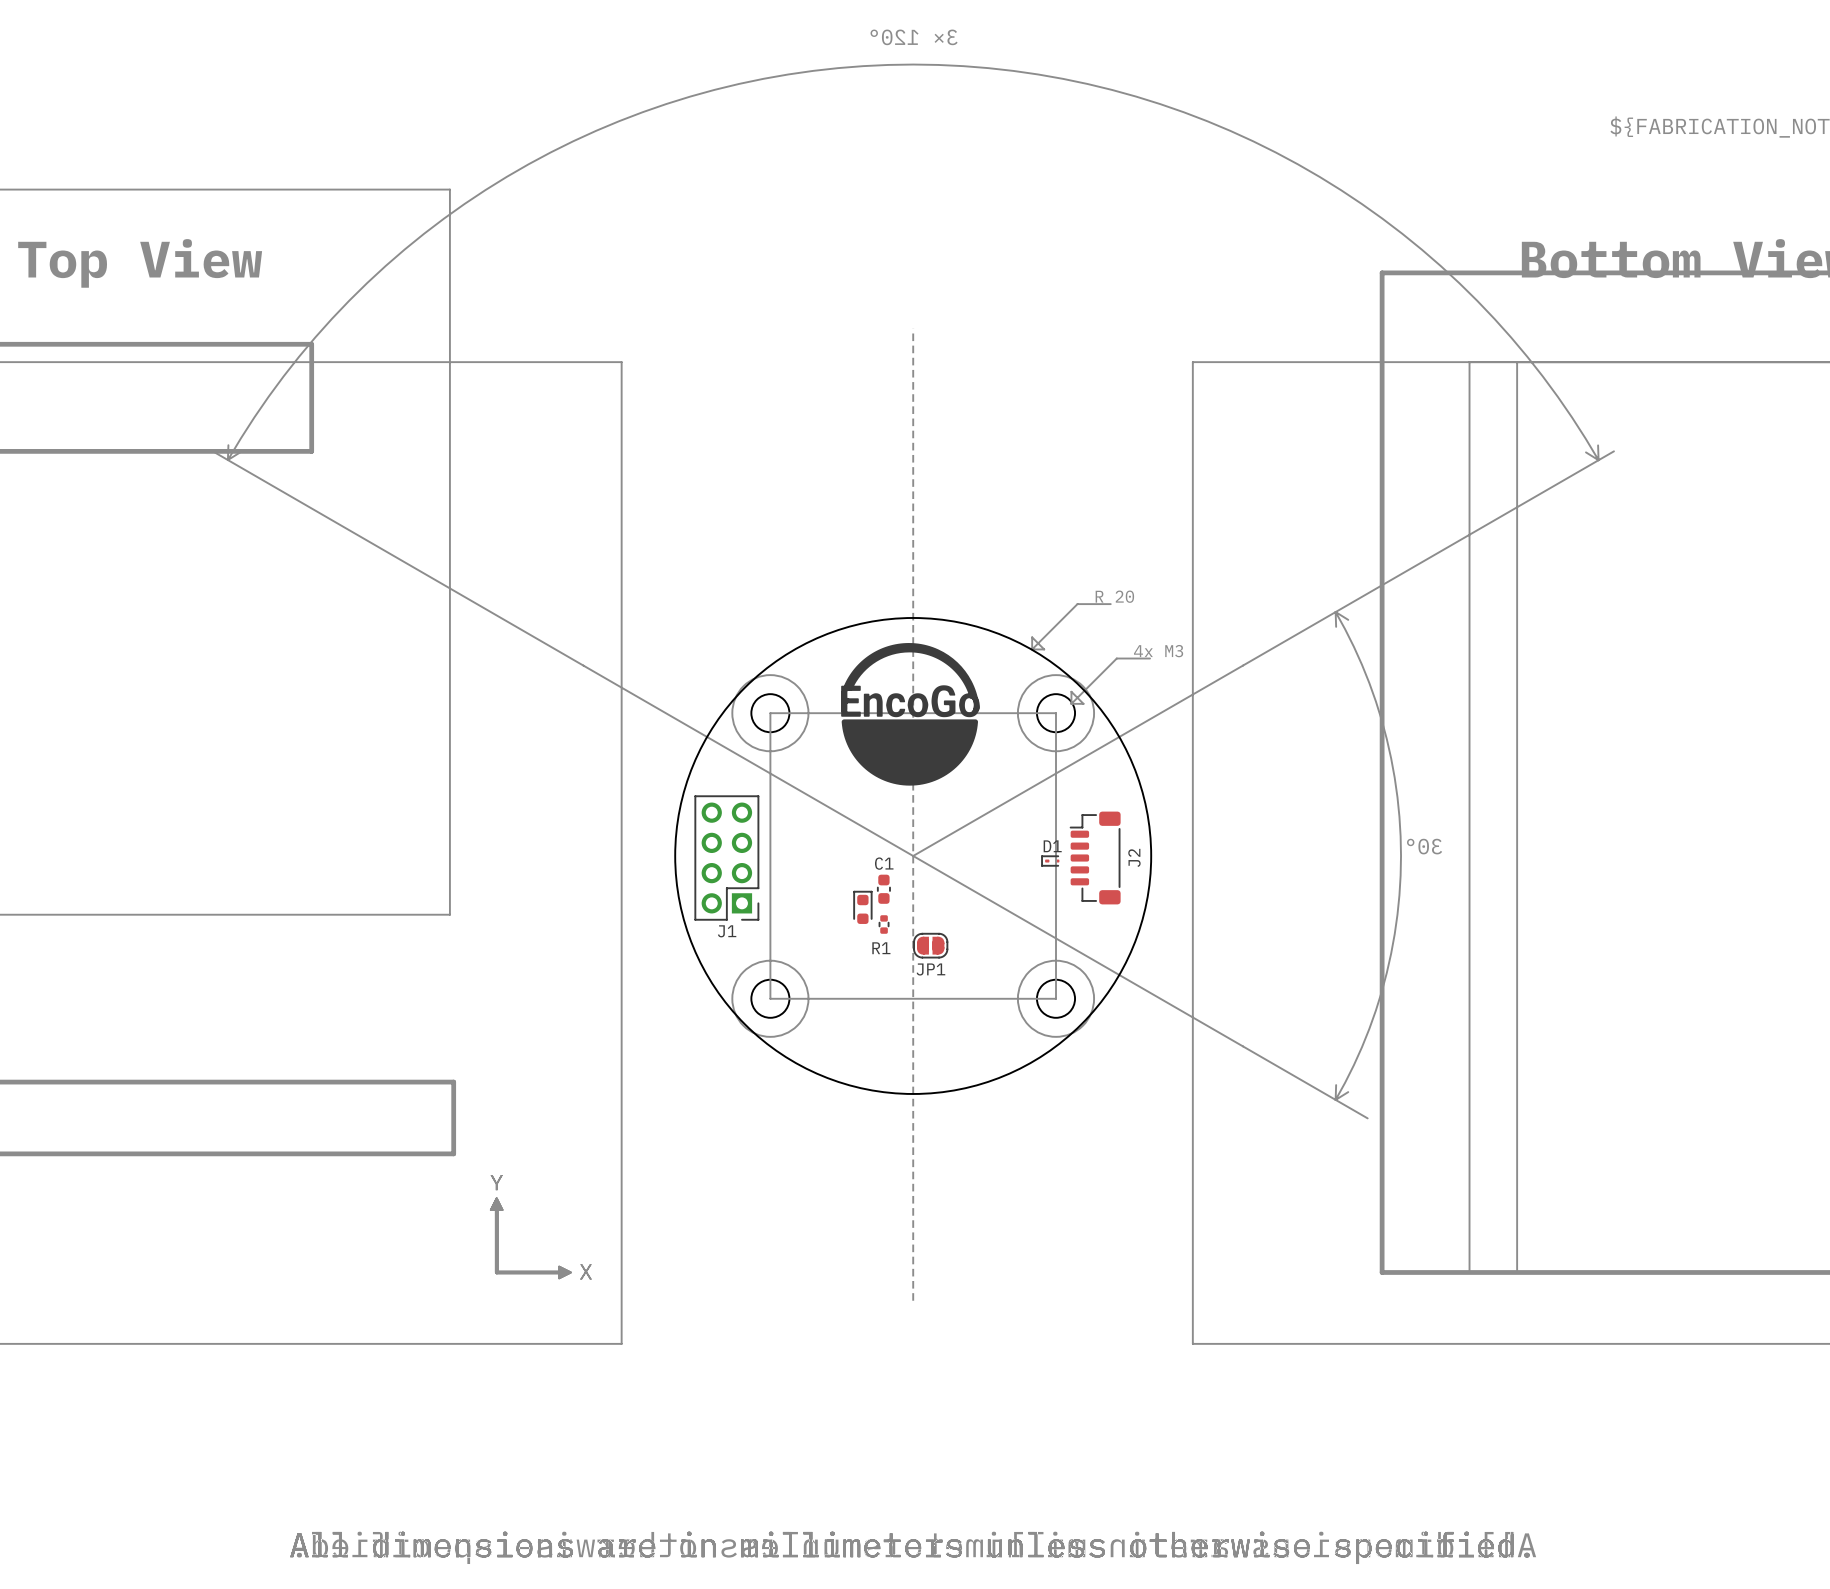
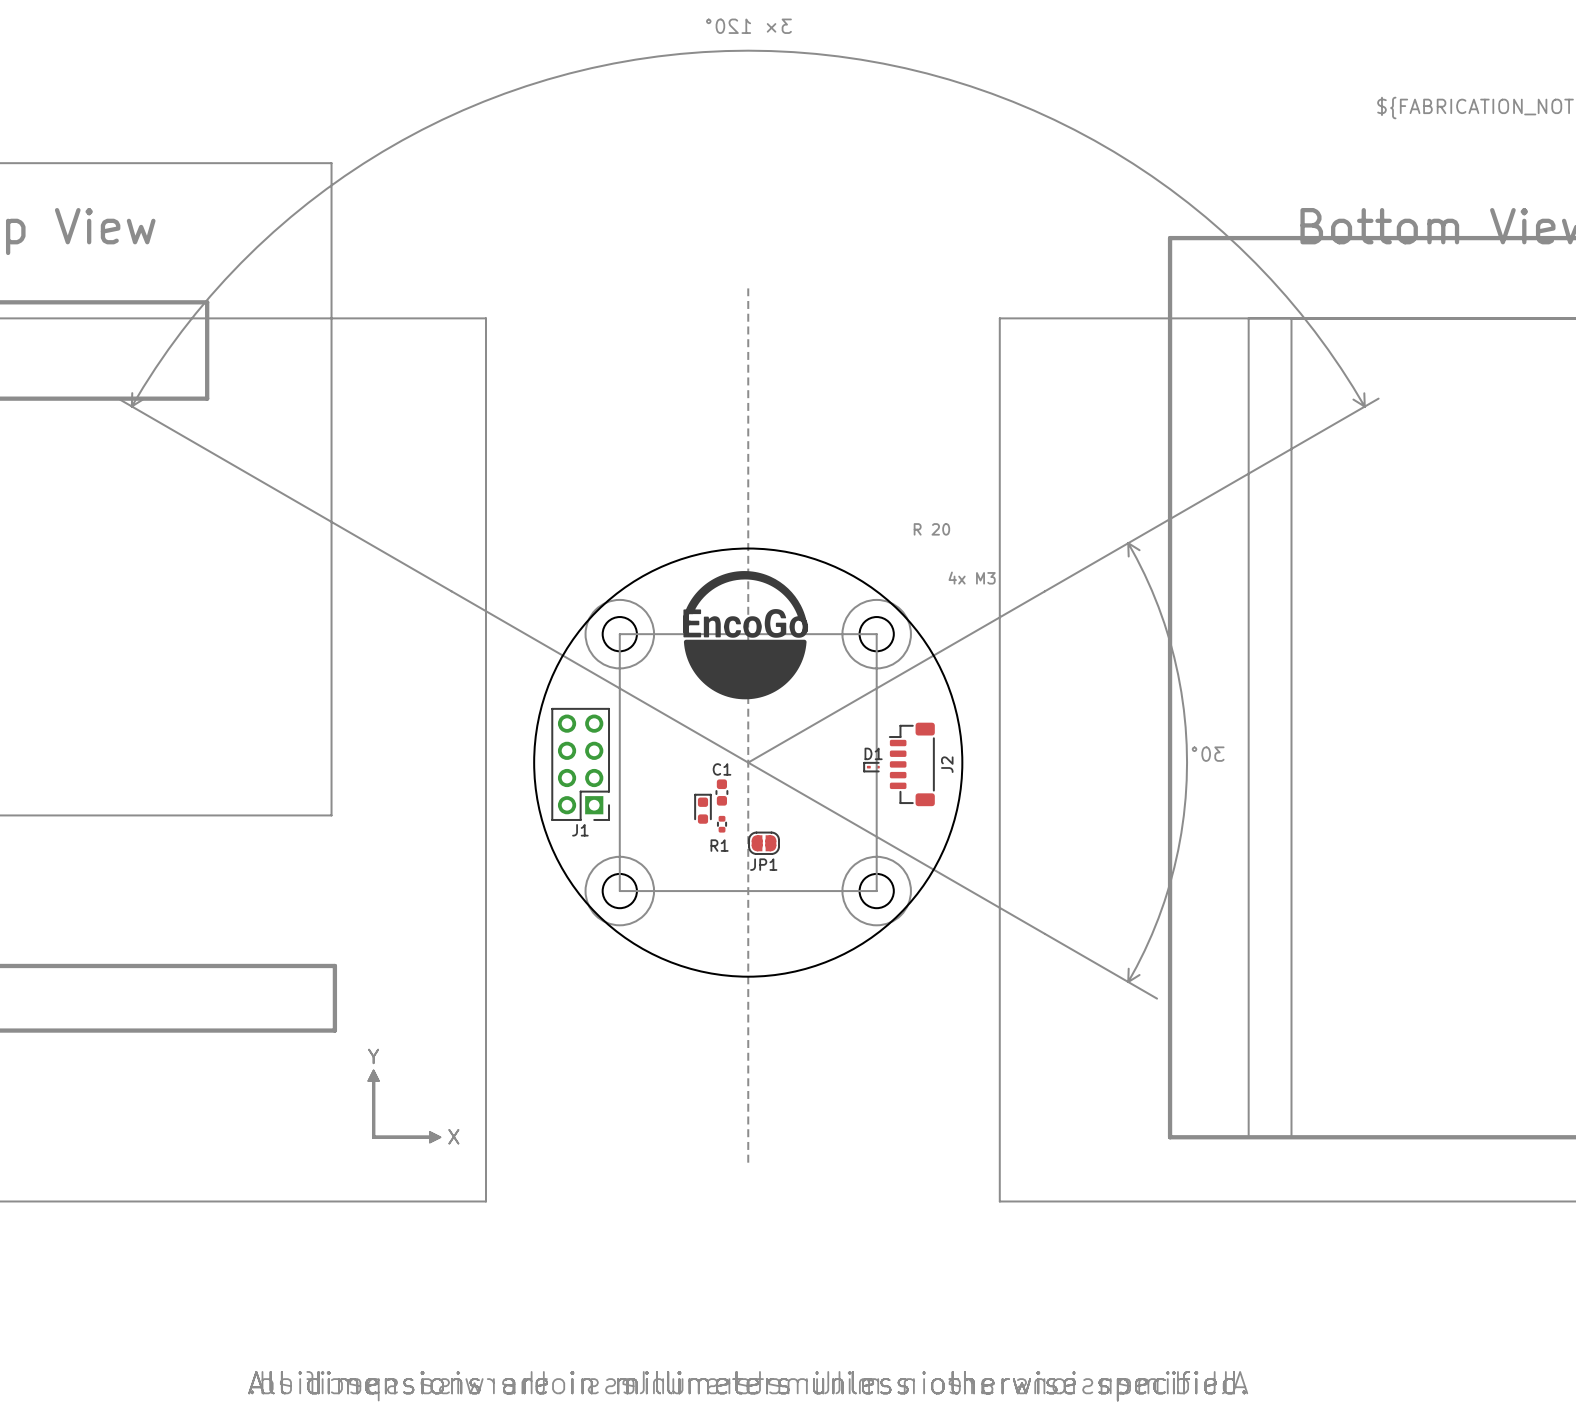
line: (1110, 604) (1077, 604) (1032, 649) -> none
line: (1032, 649) (1044, 649) (1032, 637) (1032, 649) -> none
line: (1150, 658) (1116, 658) (1071, 703) -> none
line: (1071, 703) (1083, 703) (1071, 691) (1071, 703) -> none

